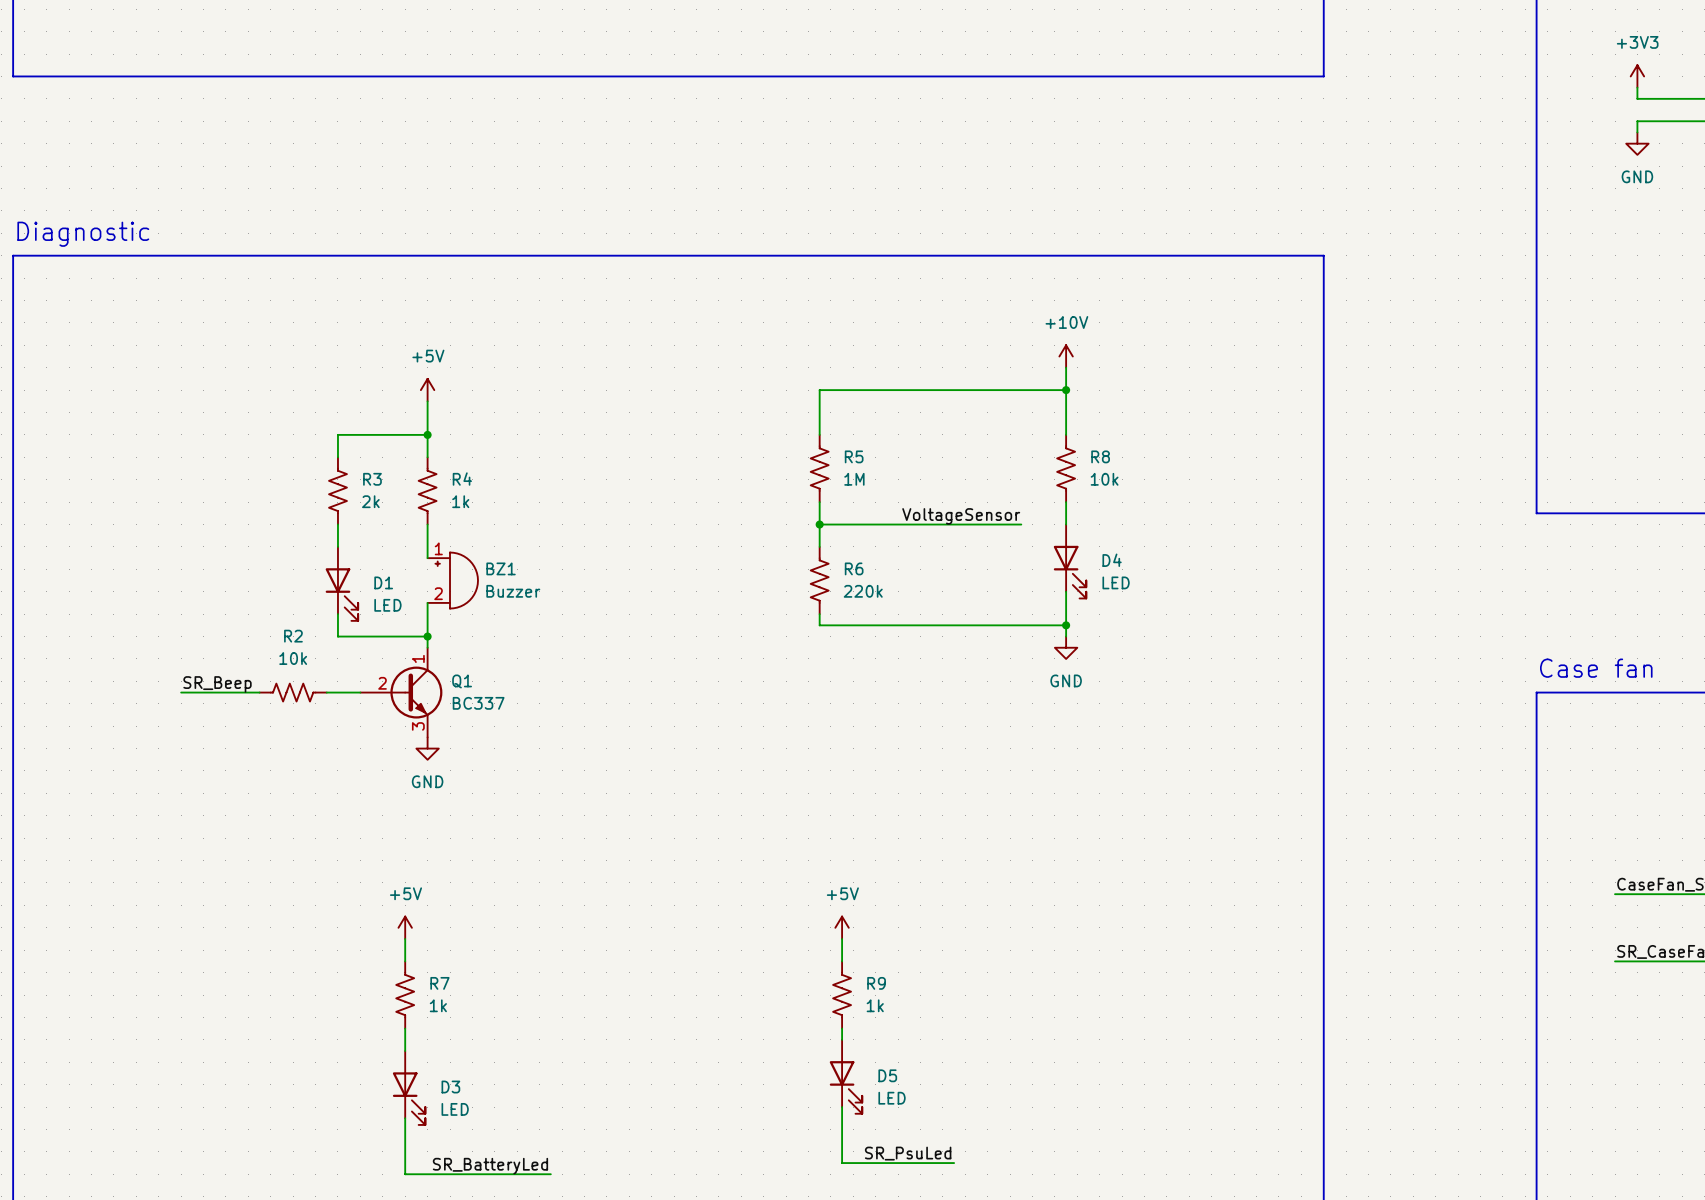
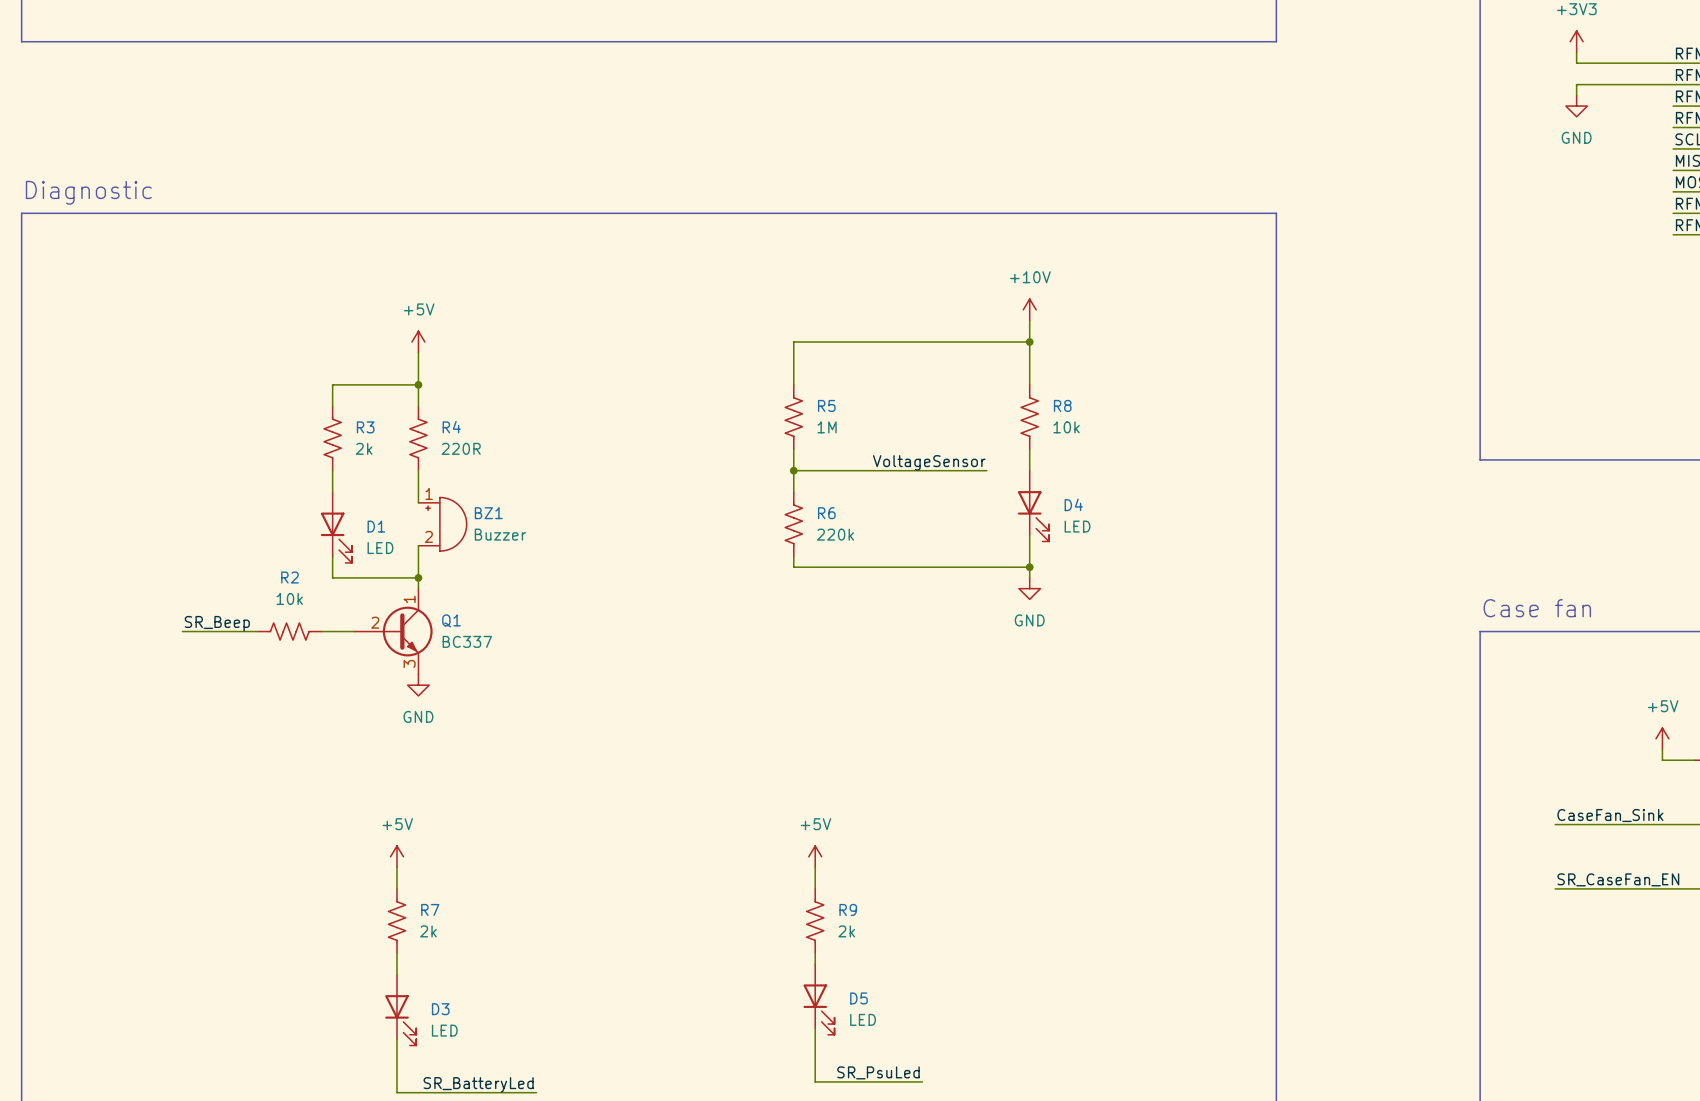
R4 value: 1k (460, 501) -> 220R (461, 448)
R7 value: 1k (438, 1005) -> 2k (428, 931)
R9 value: 1k (875, 1005) -> 2k (846, 931)

